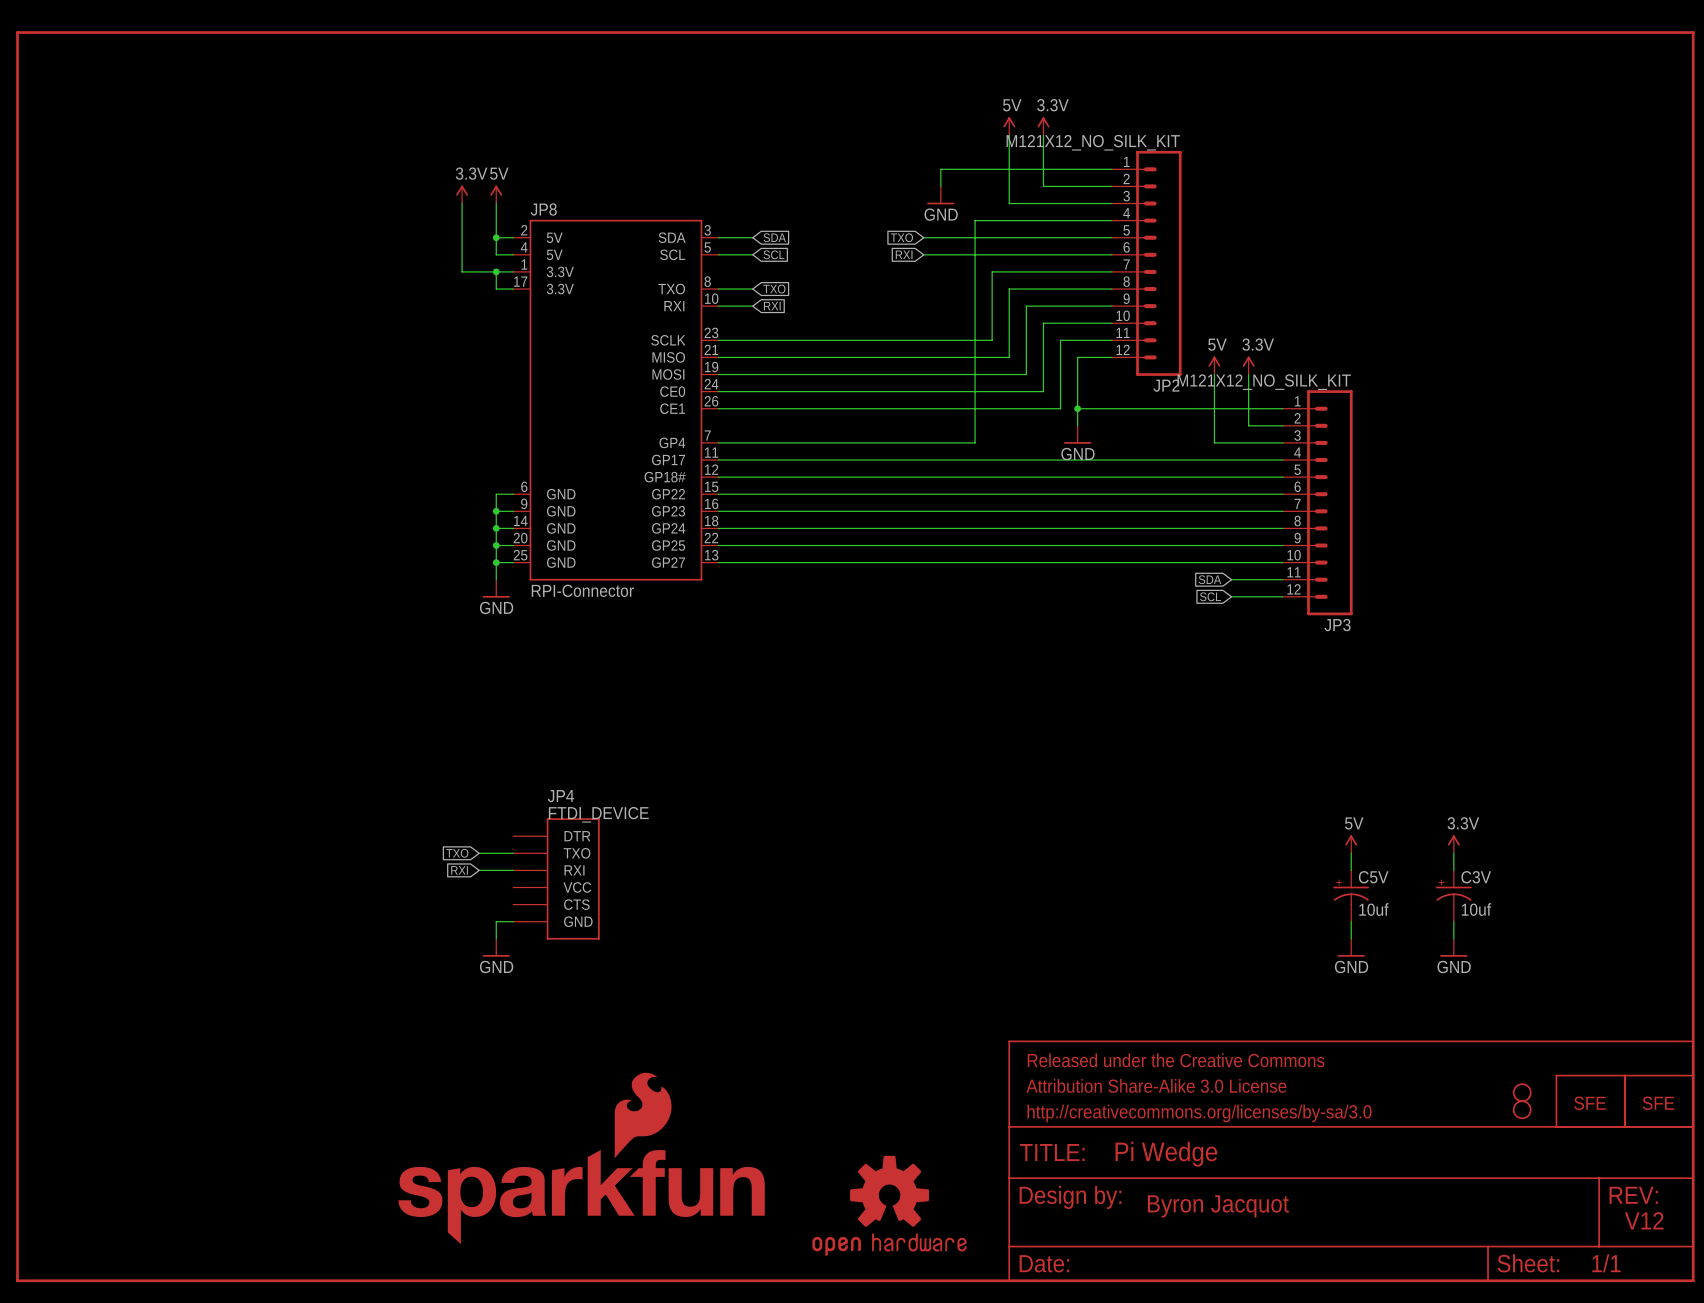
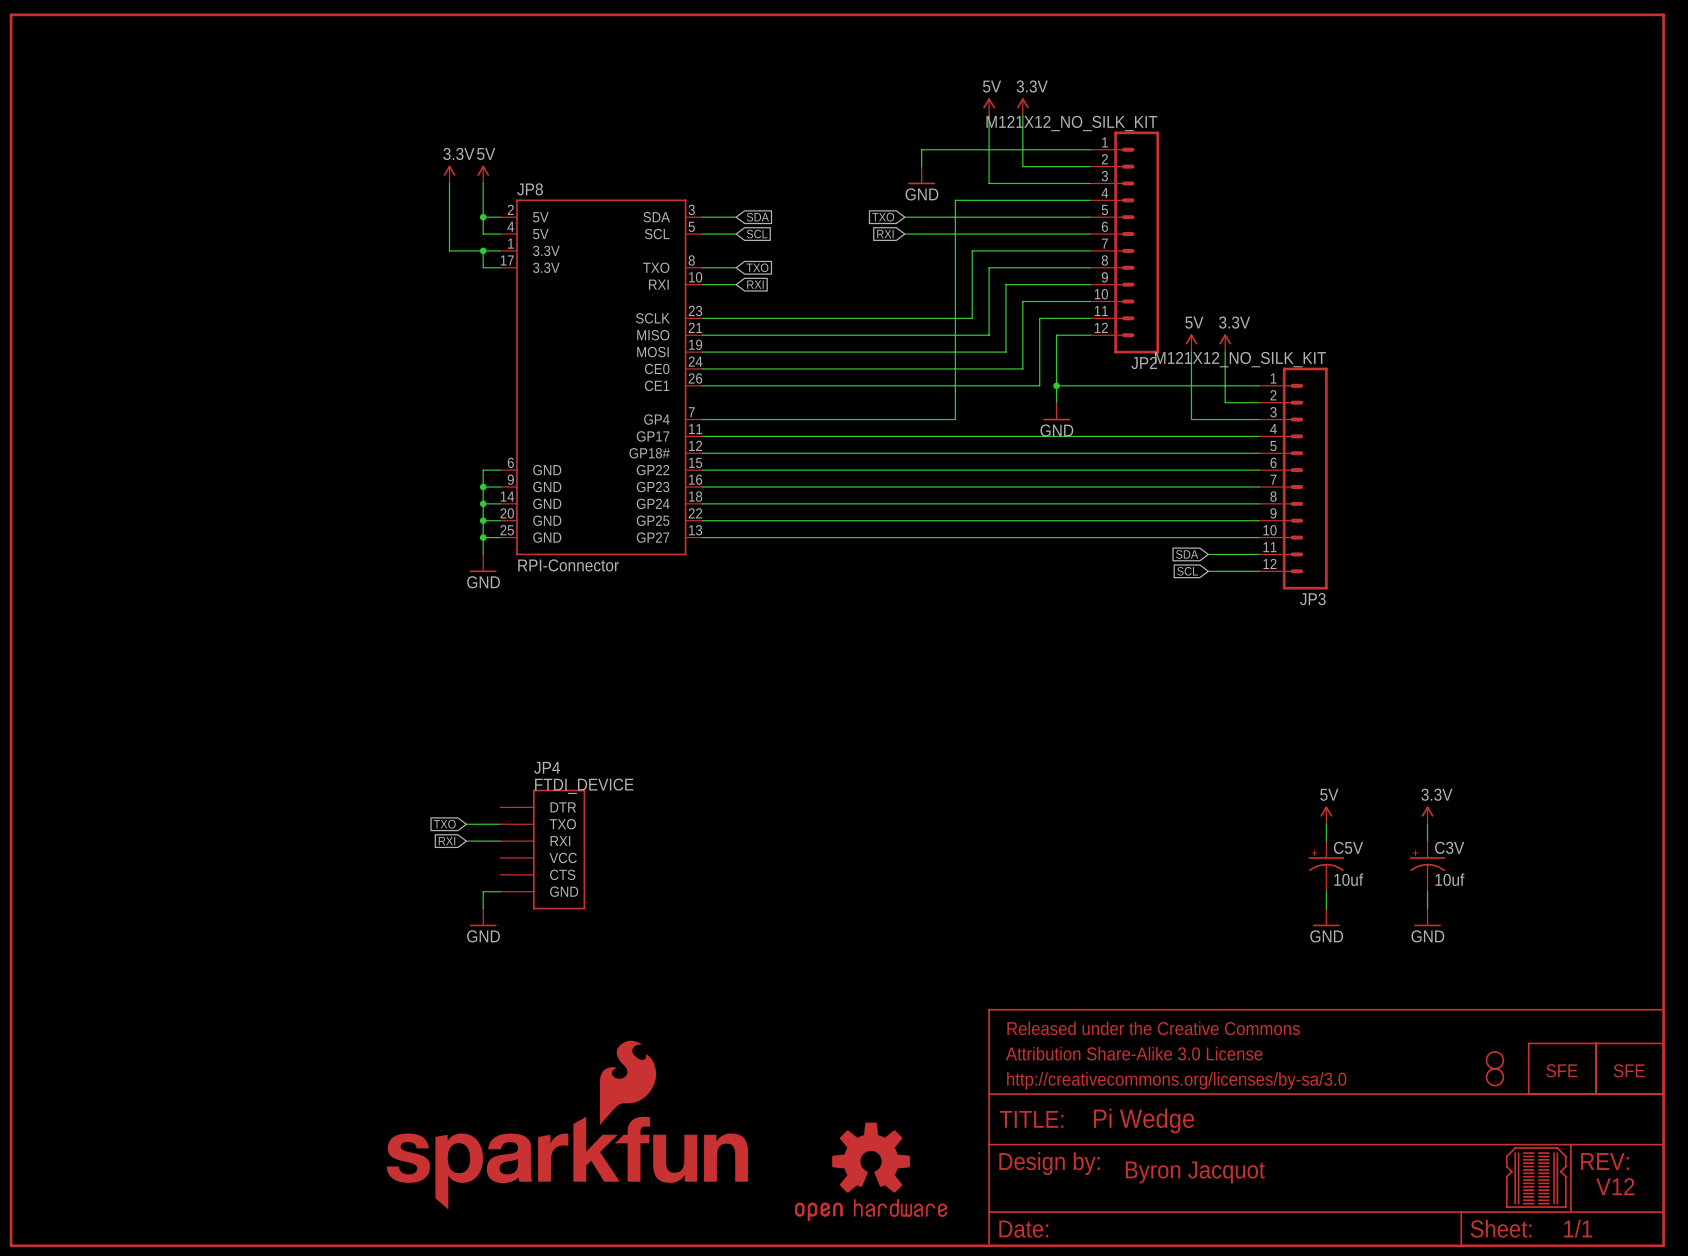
part: none -> (1536, 1177)

